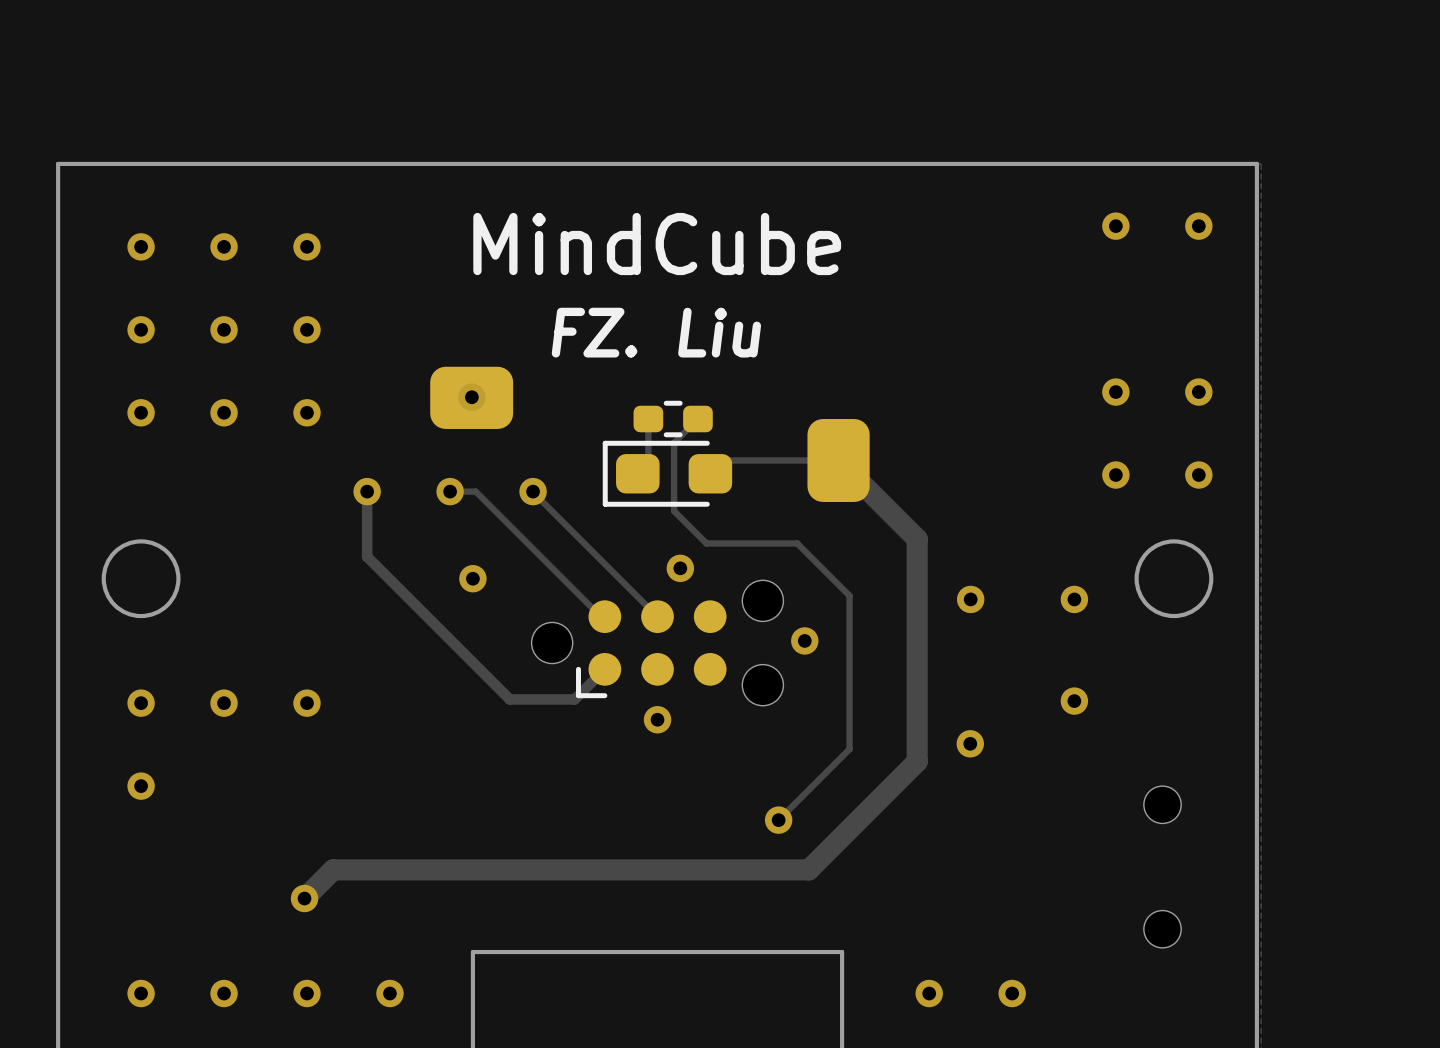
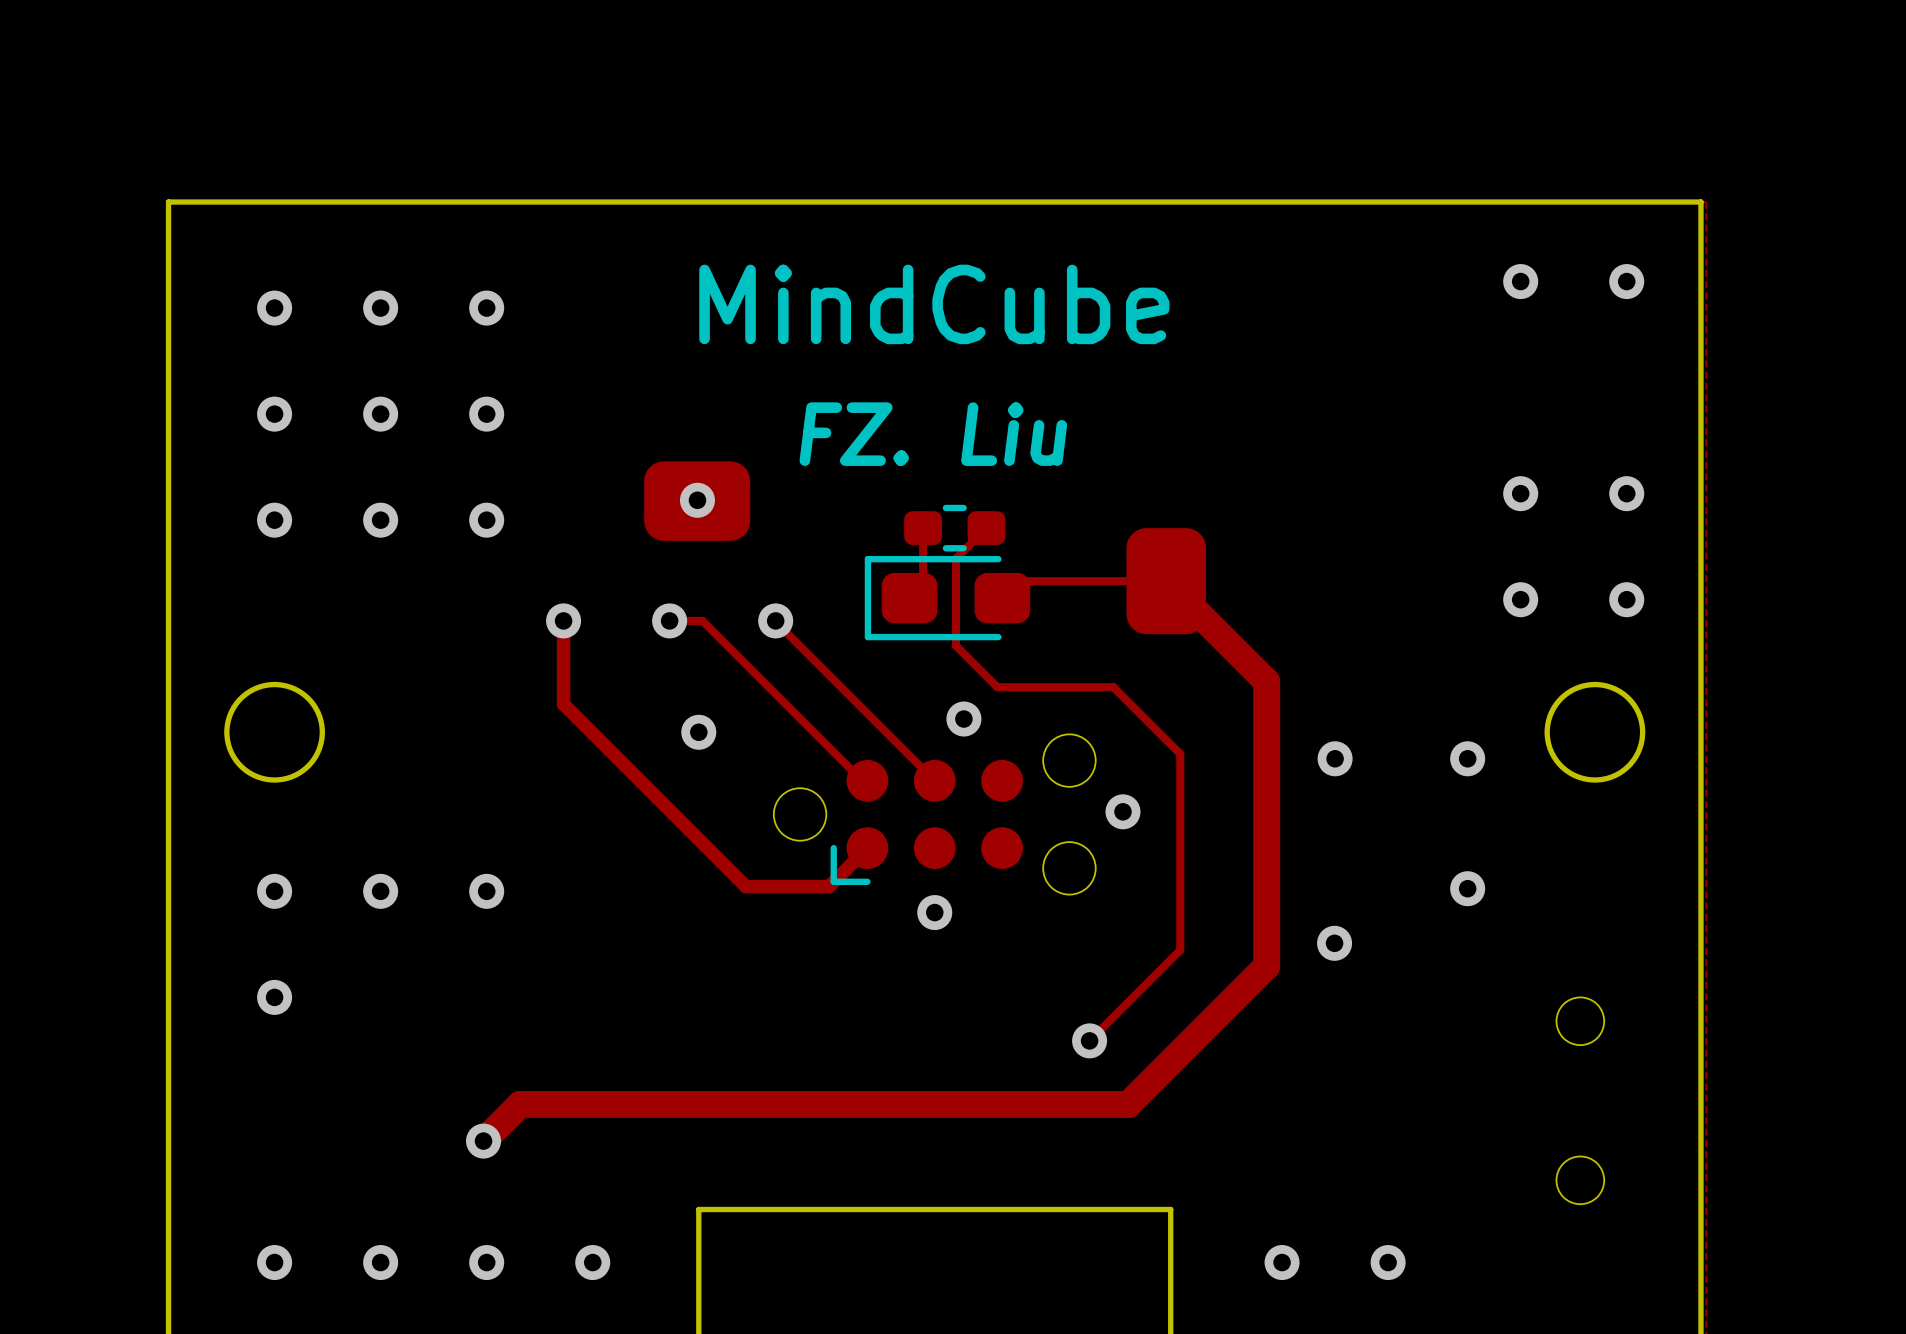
text position: FZ. Liu (656, 332) -> FZ. Liu (933, 434)

